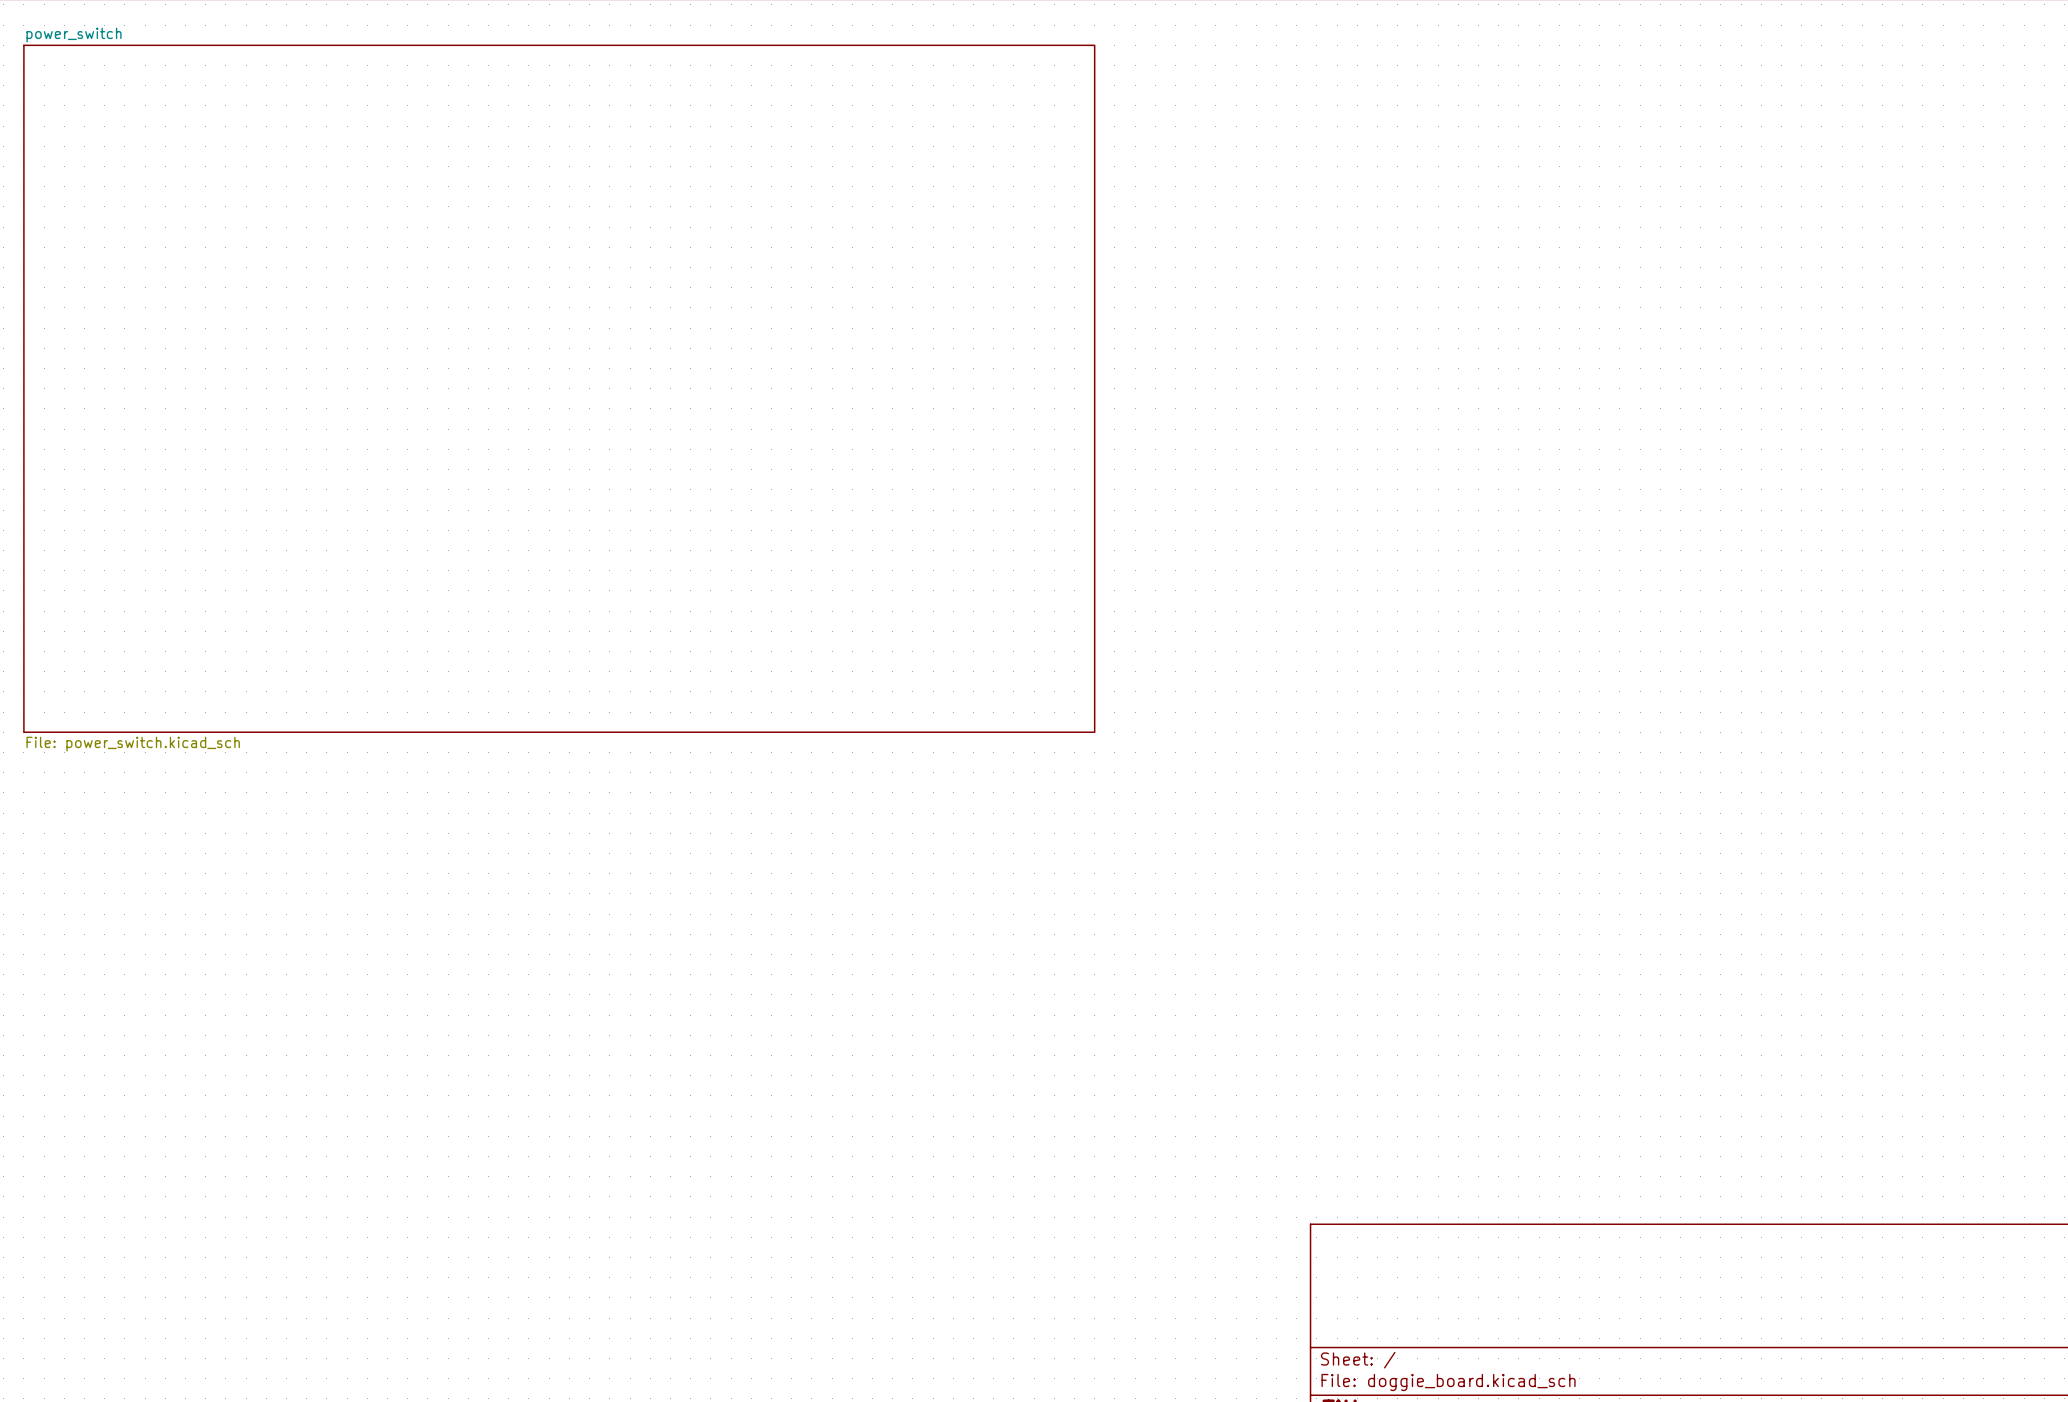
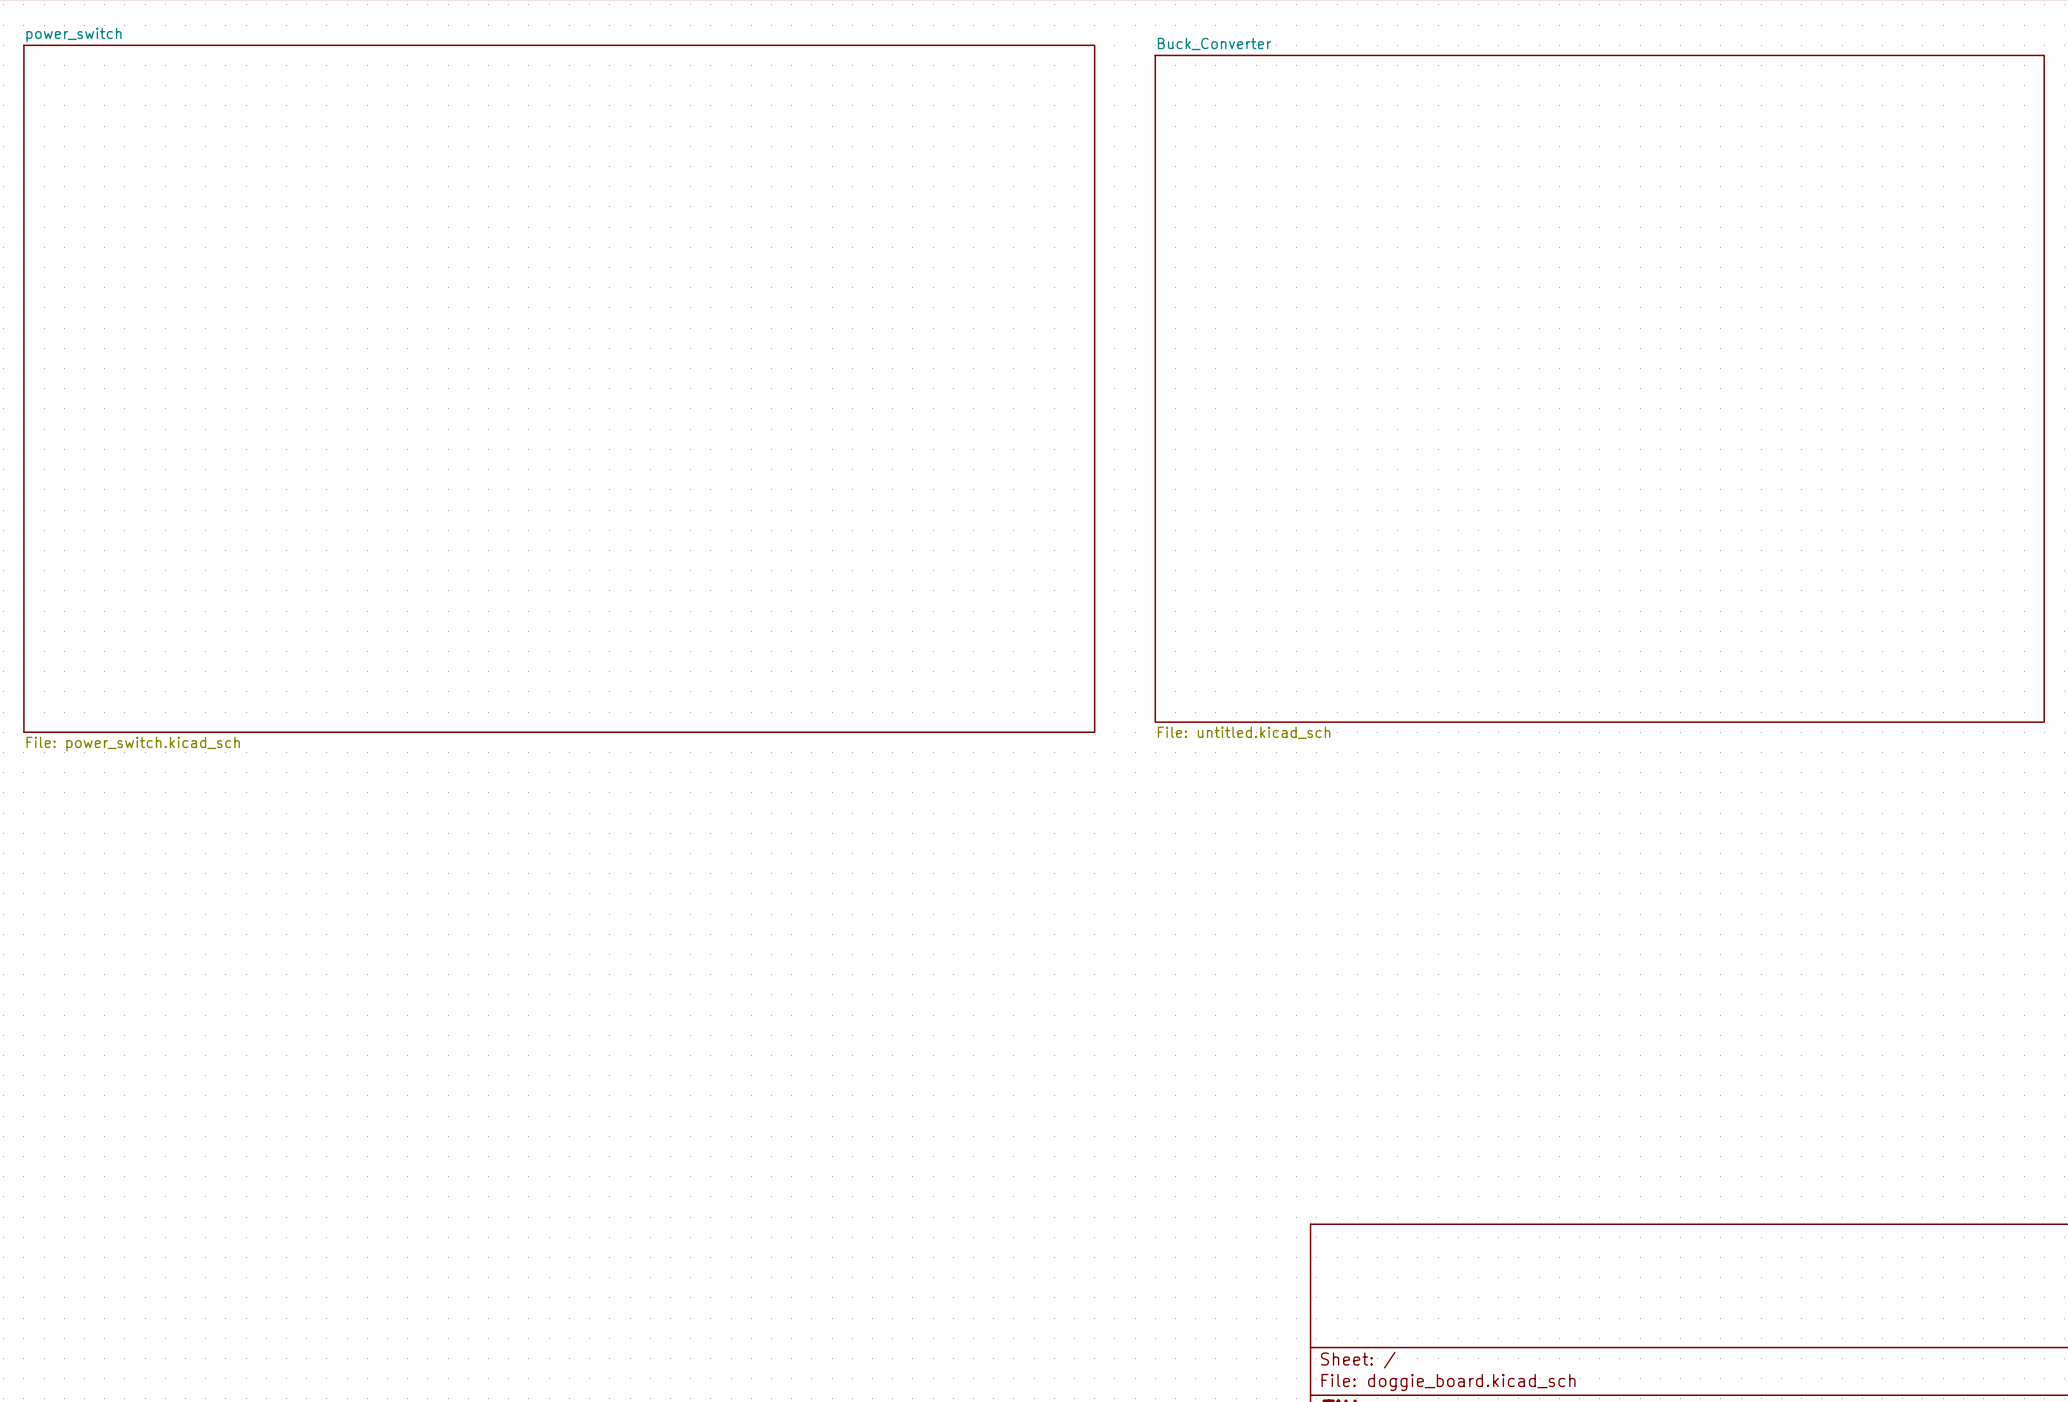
sheet Buck_Converter: none -> File: untitled.kicad_sch (1599, 388)

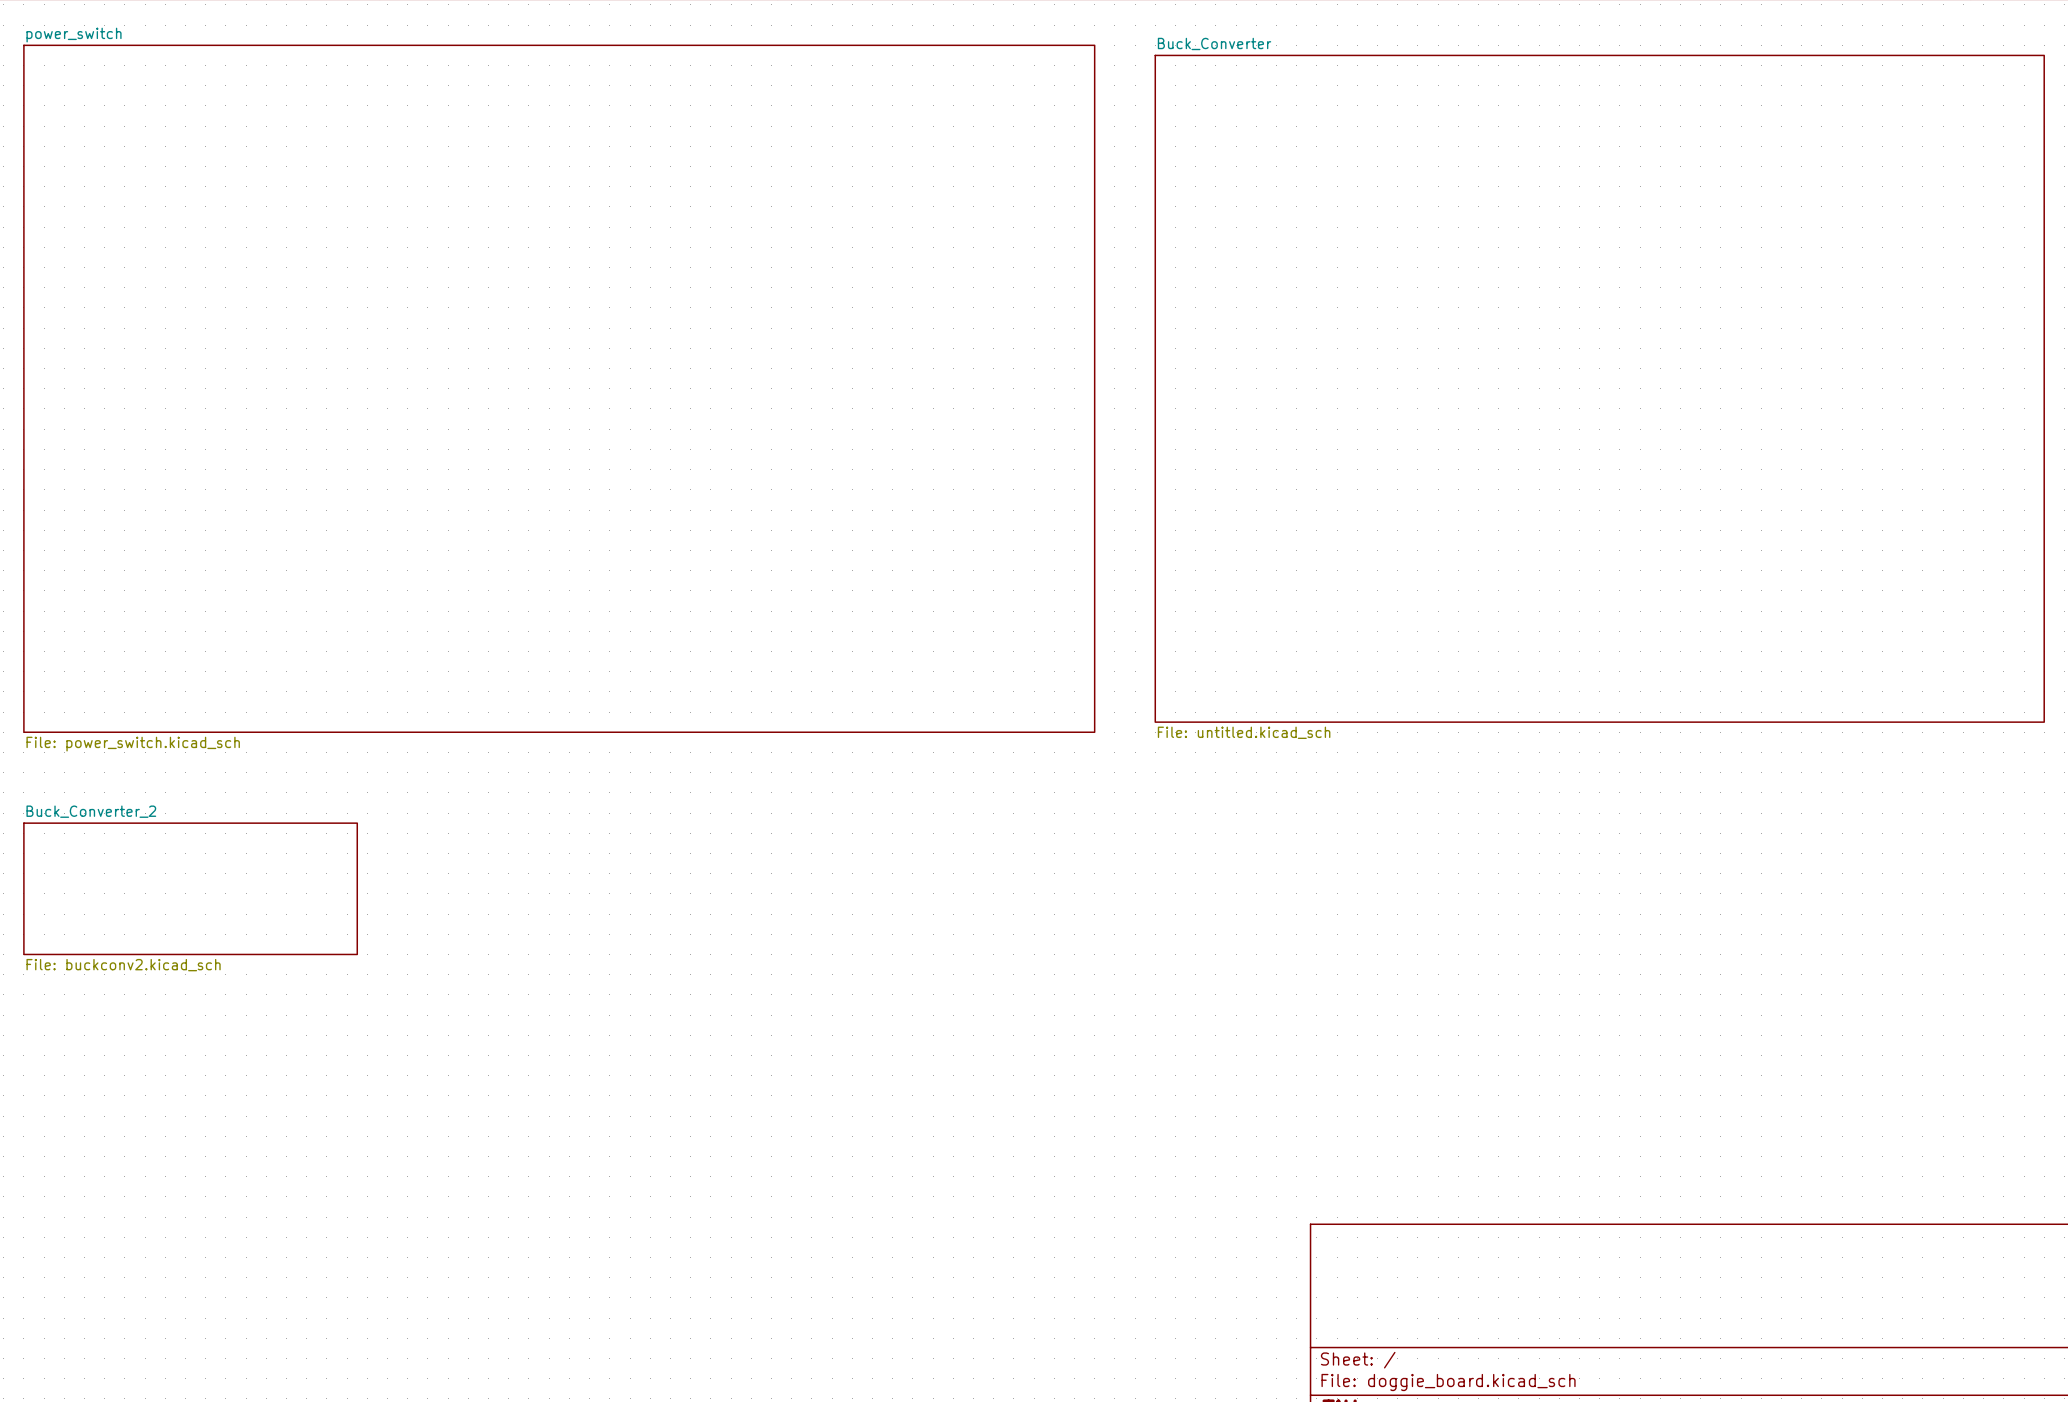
sheet Buck_Converter_2: none -> File: buckconv2.kicad_sch (190, 888)

